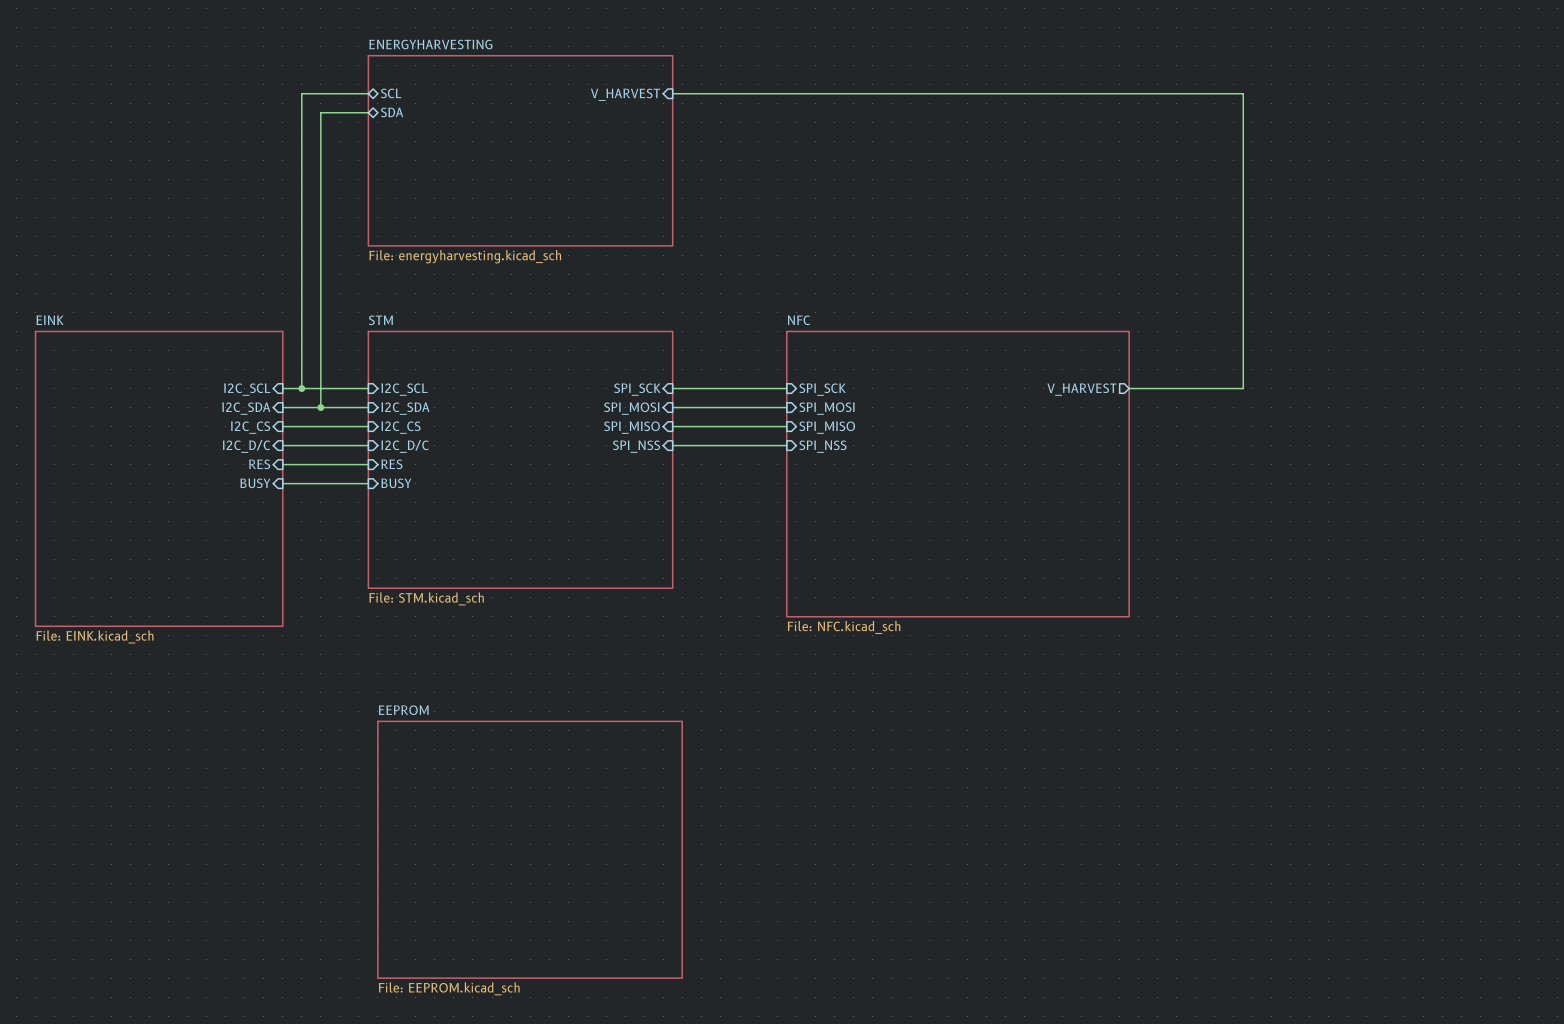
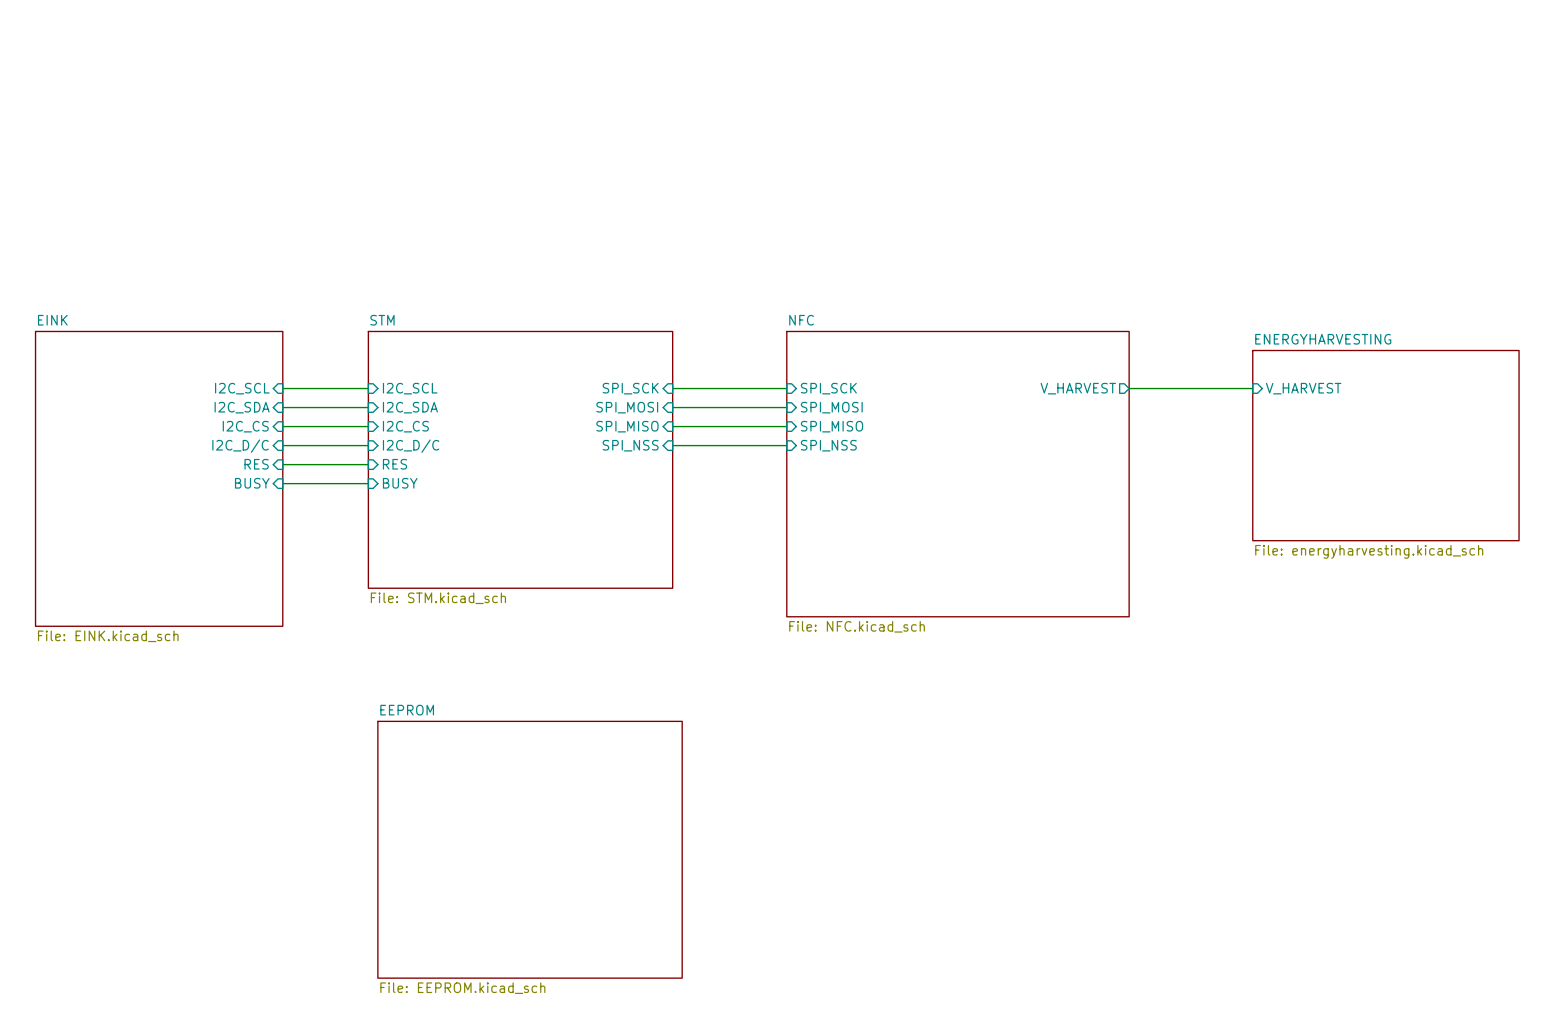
wire: (368, 93) (301, 93) (301, 388) -> none
sheet pin: SCL (391, 93) -> none
wire: (672, 93) (1243, 93) (1243, 388) -> (1252, 388) (1243, 388)
sheet pin: V_HARVEST (625, 94) -> none
wire: (368, 112) (320, 112) (320, 407) -> none
sheet pin: SDA (392, 112) -> none
sheet ENERGYHARVESTING: File: energyharvesting.kicad_sch (520, 150) -> none
junction: (301, 388) -> none
sheet pin: none -> V_HARVEST (1303, 388)
junction: (320, 407) -> none
sheet ENERGYHARVESTING: none -> File: energyharvesting.kicad_sch (1385, 445)

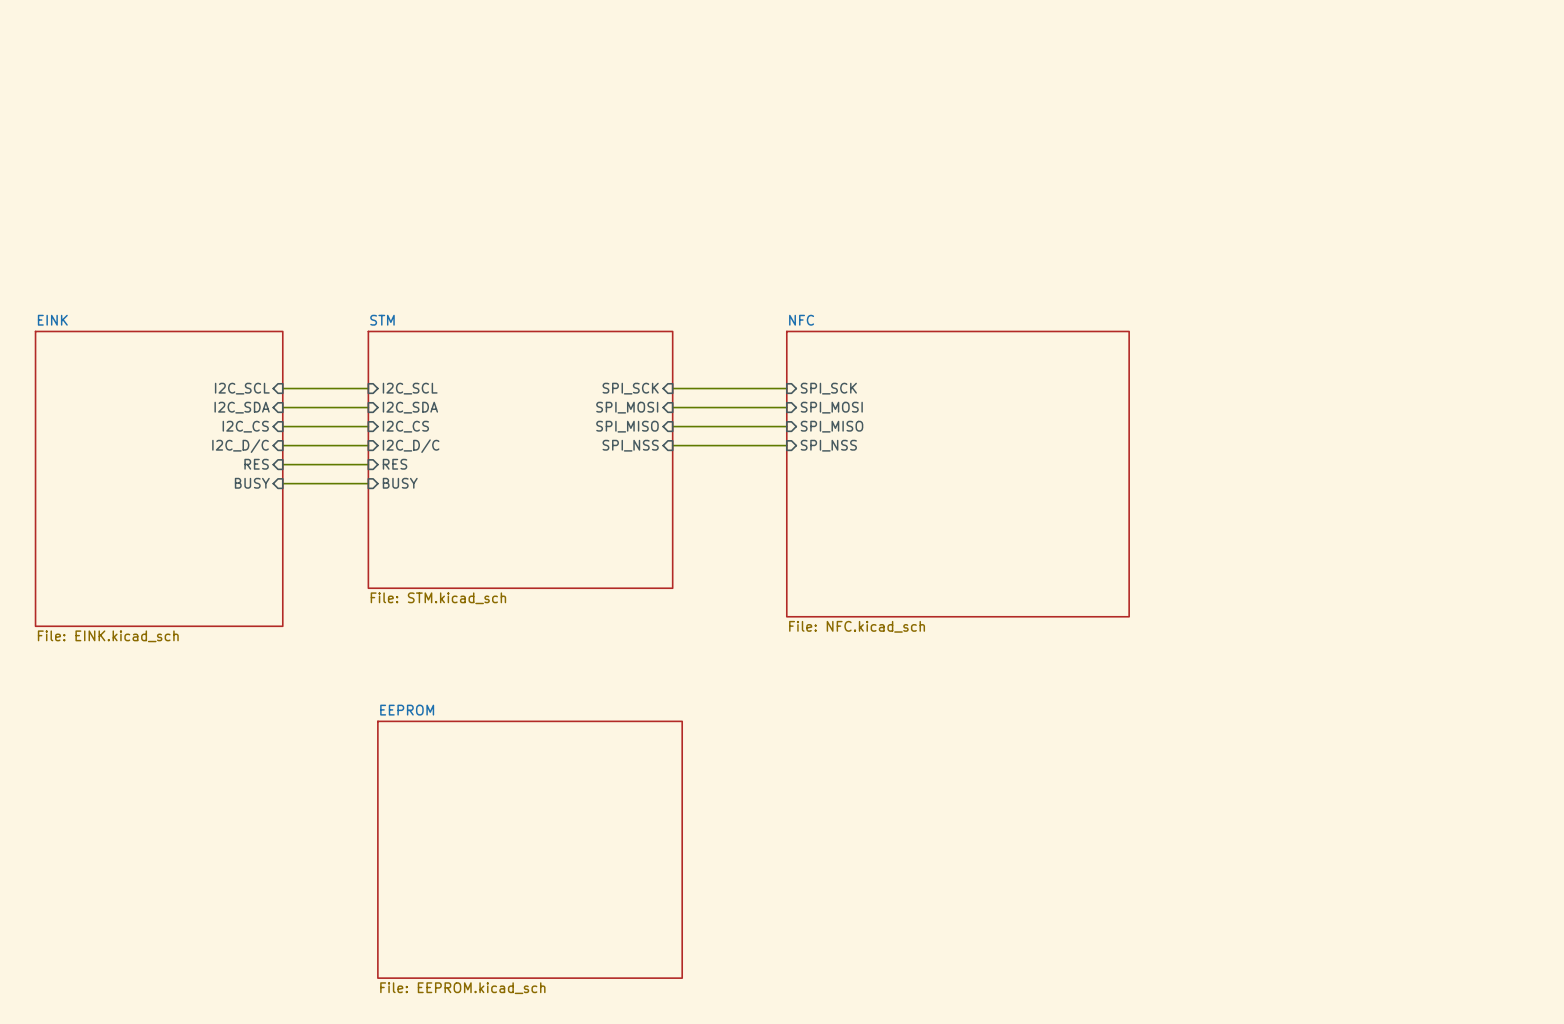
sheet pin: V_HARVEST (1078, 388) -> none
wire: (1129, 388) (1252, 388) -> none
sheet pin: V_HARVEST (1303, 388) -> none
sheet ENERGYHARVESTING: File: energyharvesting.kicad_sch (1385, 445) -> none

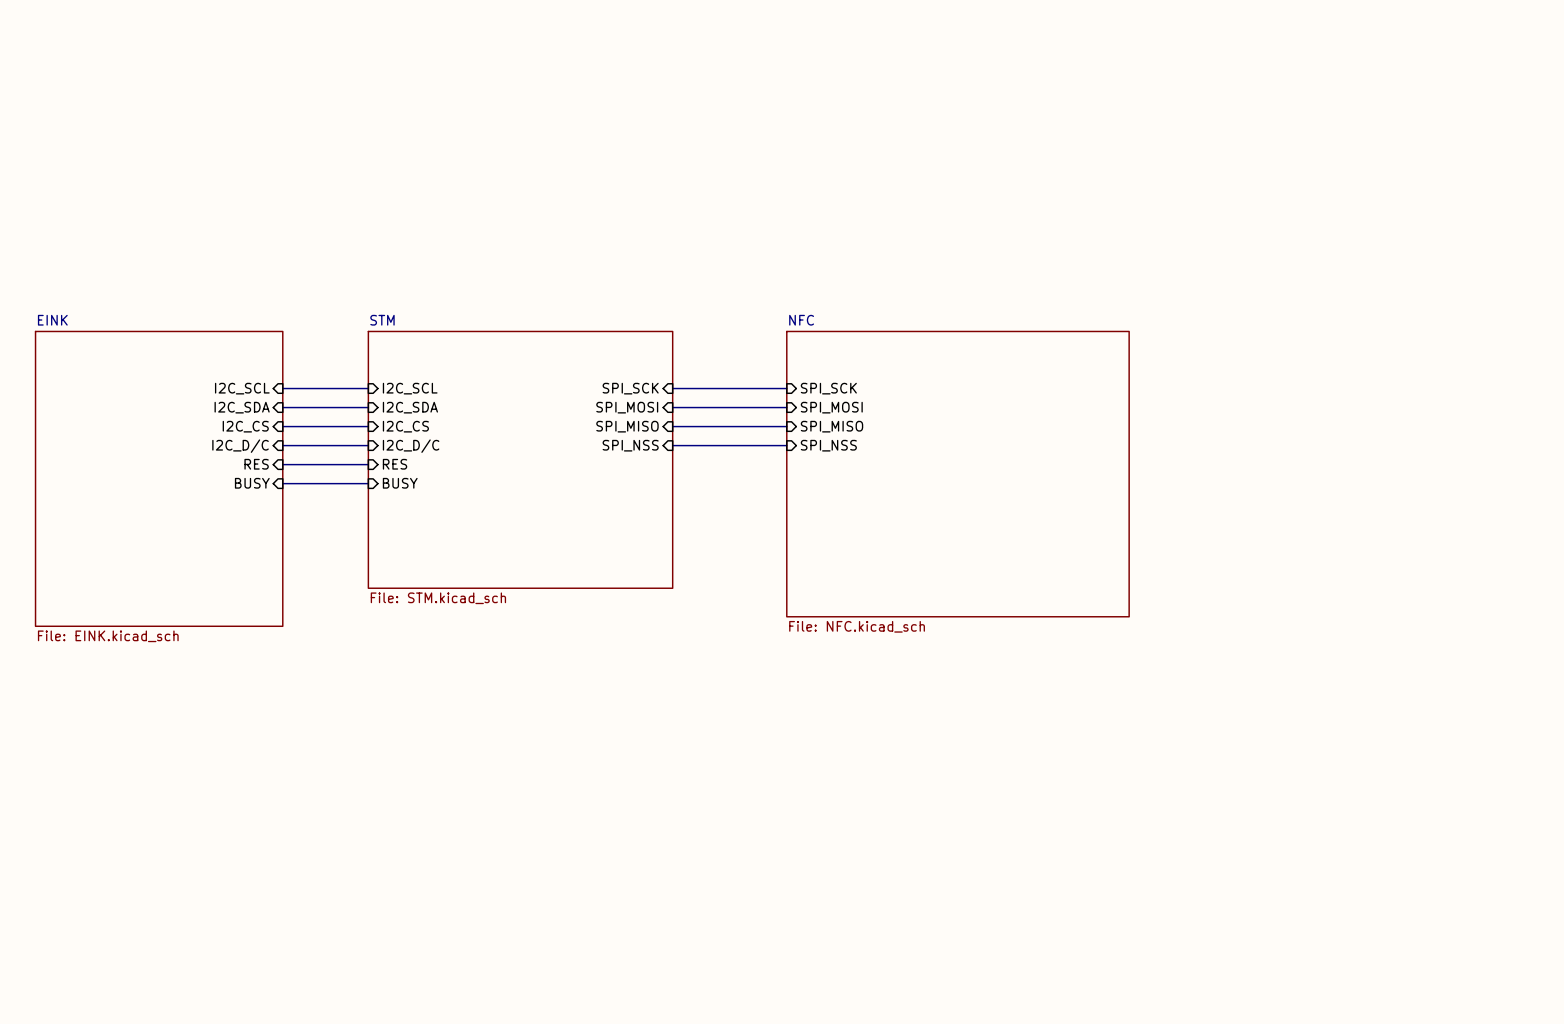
sheet EEPROM: File: EEPROM.kicad_sch (530, 849) -> none

